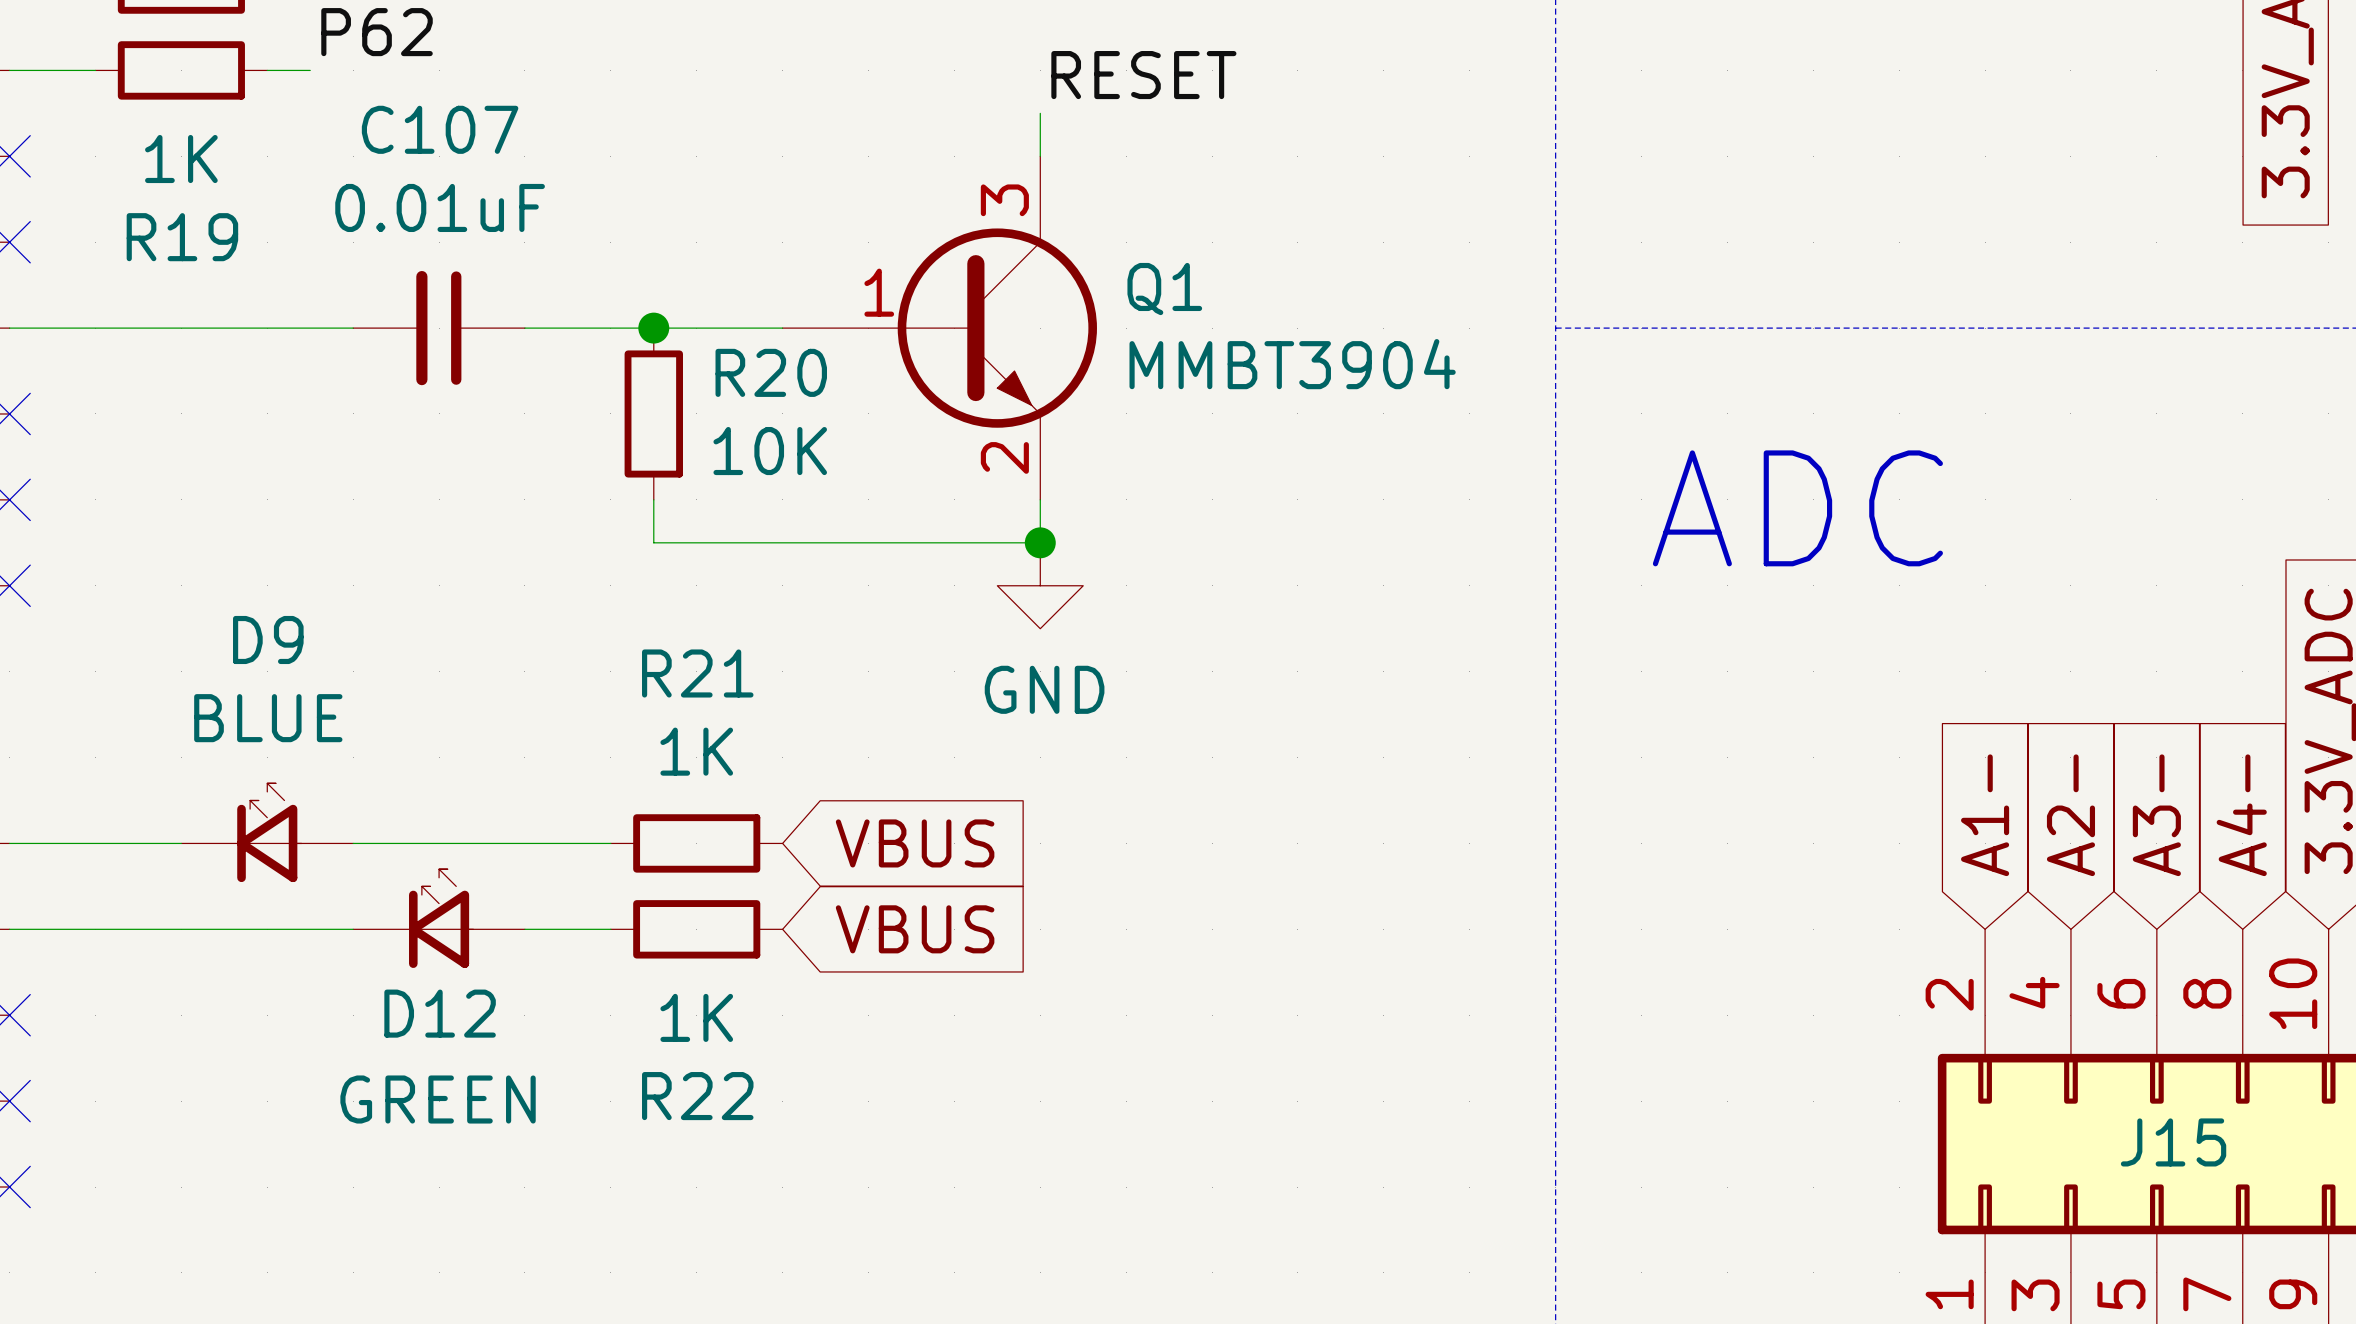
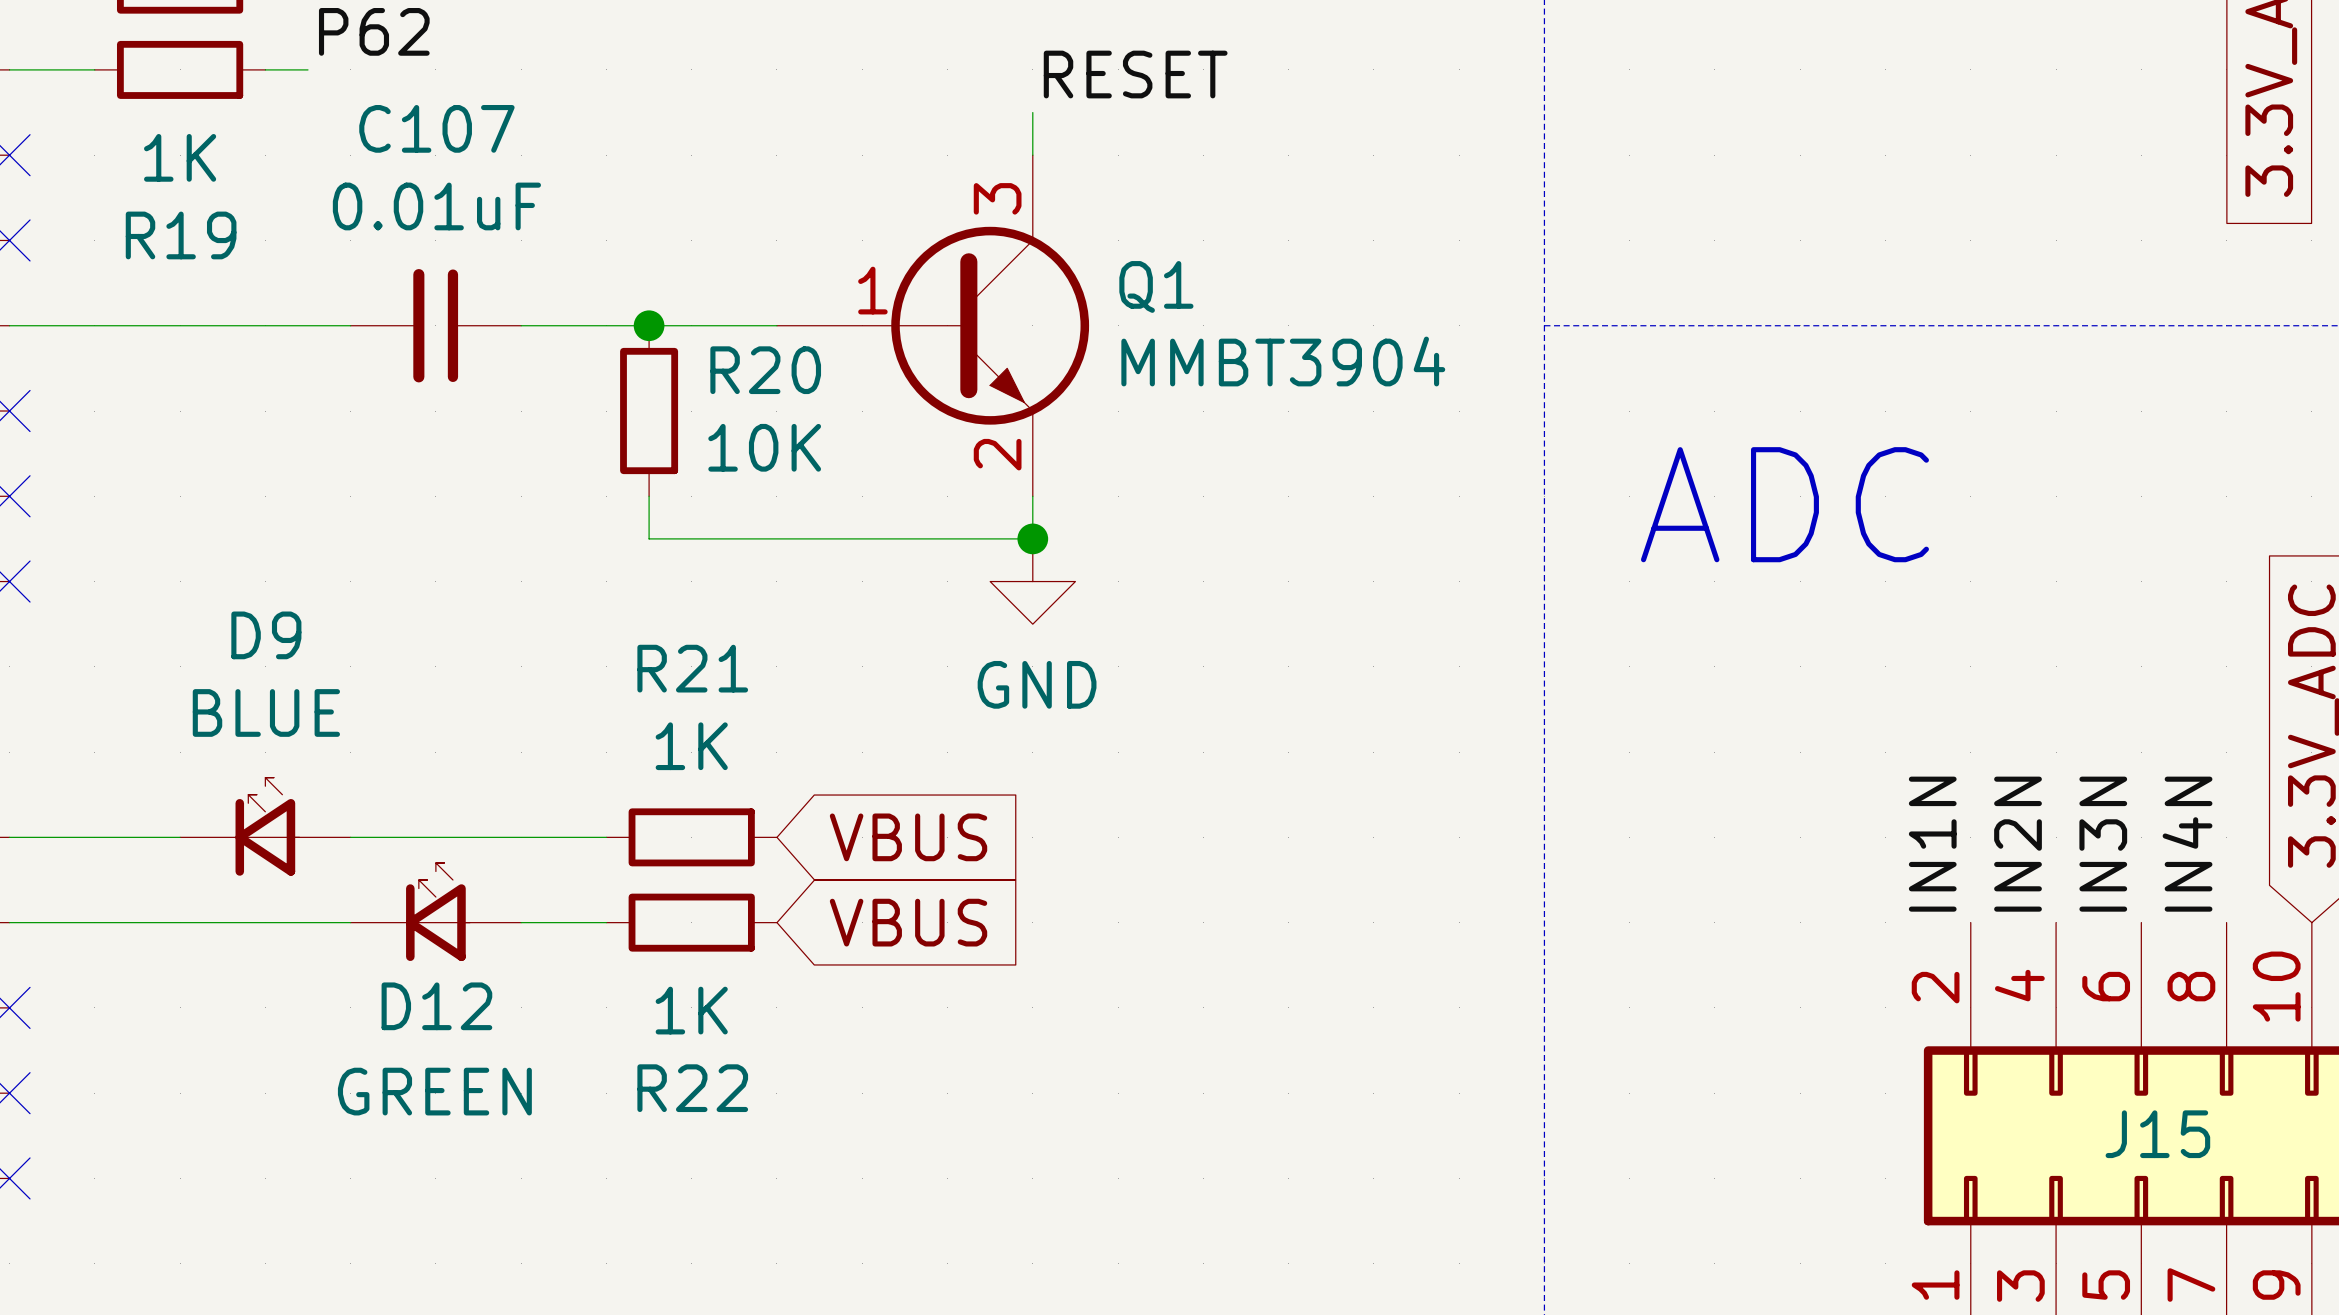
global label: A1- (1985, 815) -> none
global label: A2- (2070, 815) -> none
global label: A3- (2156, 815) -> none
global label: A4- (2241, 815) -> none
label: none -> IN1N (1932, 844)
label: none -> IN2N (2018, 844)
label: none -> IN3N (2103, 844)
label: none -> IN4N (2187, 844)

